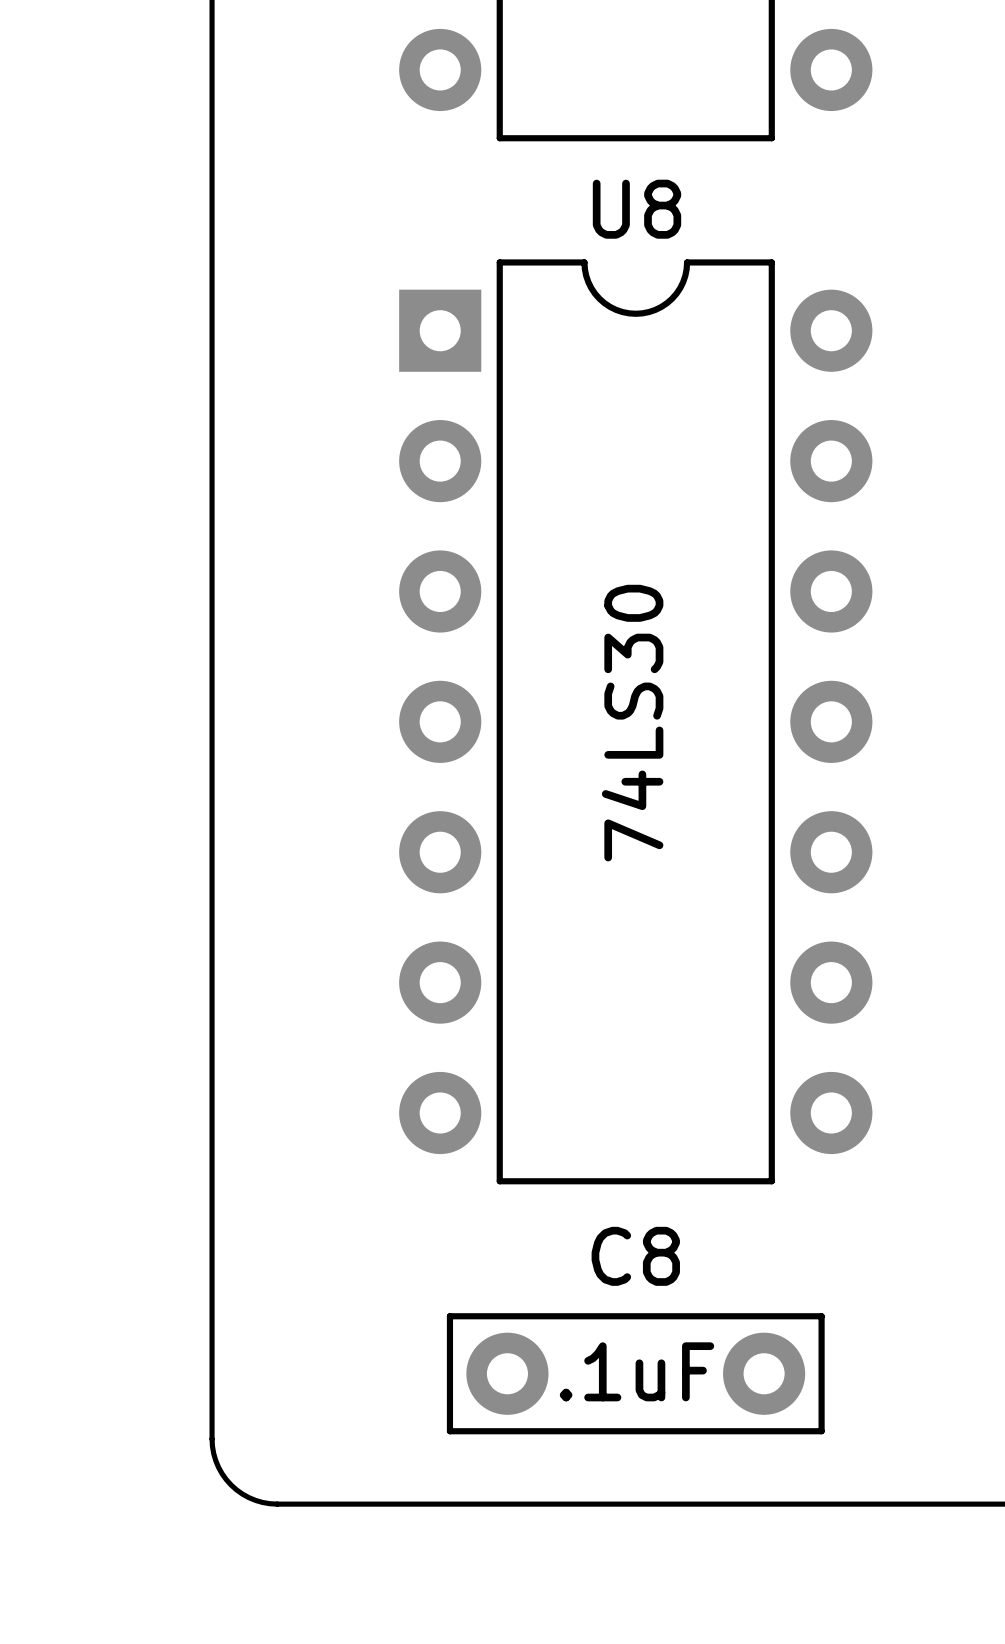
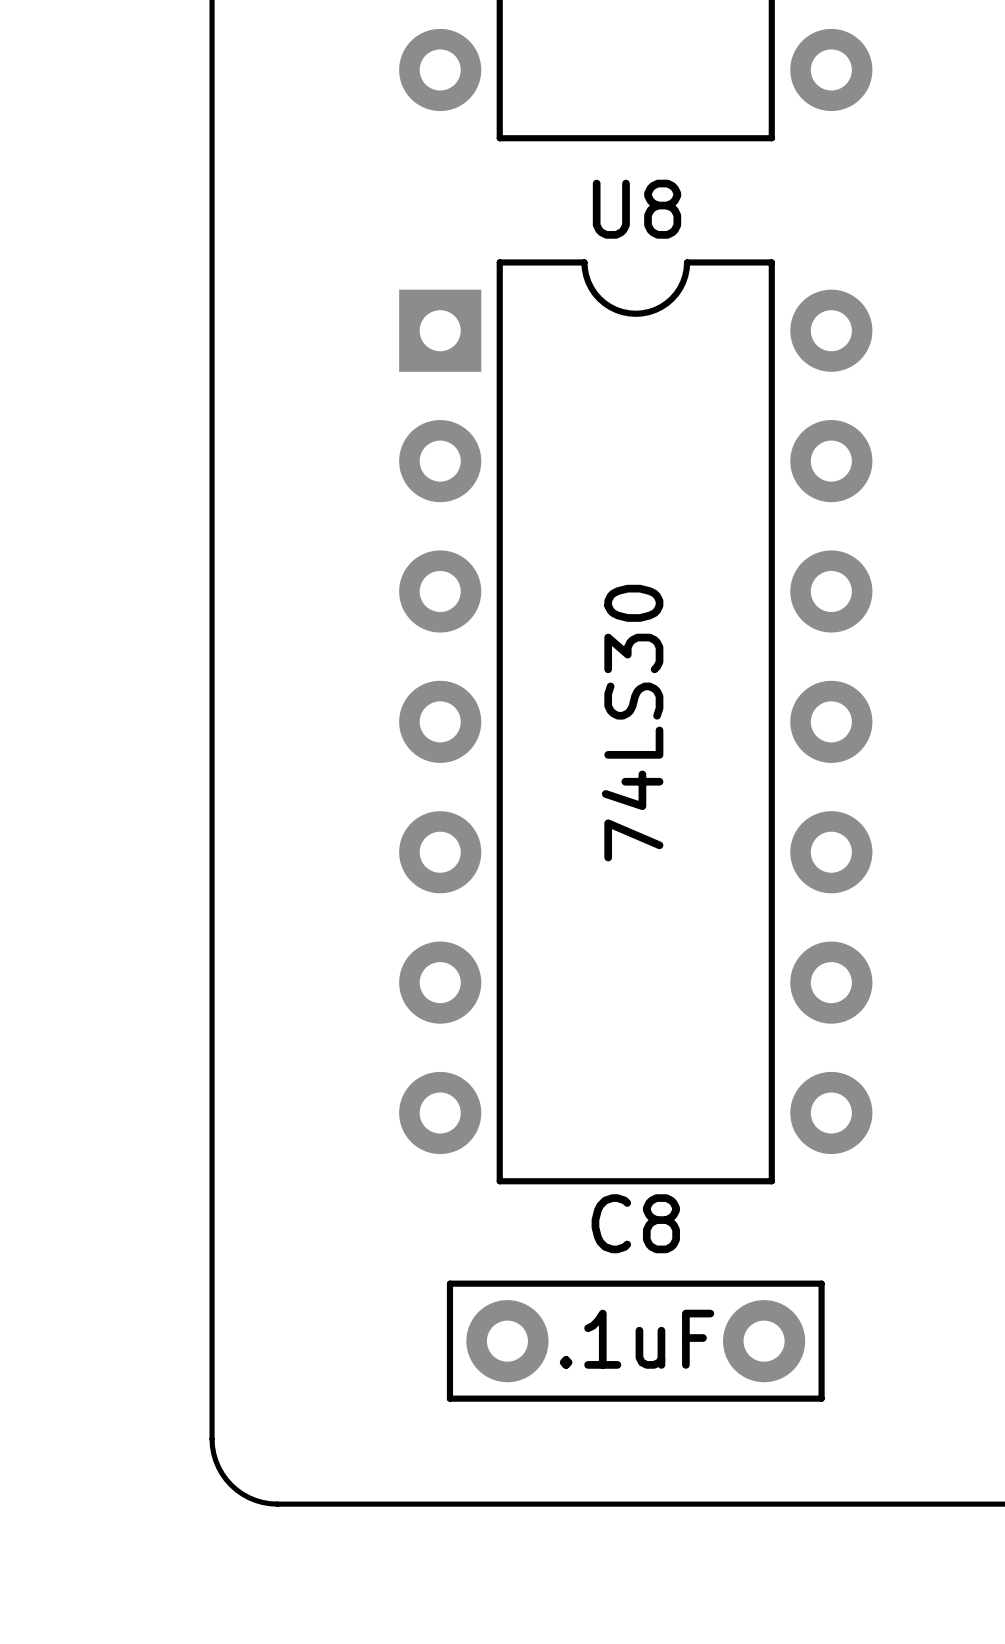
C8 position: (635, 1373) -> (635, 1341)

